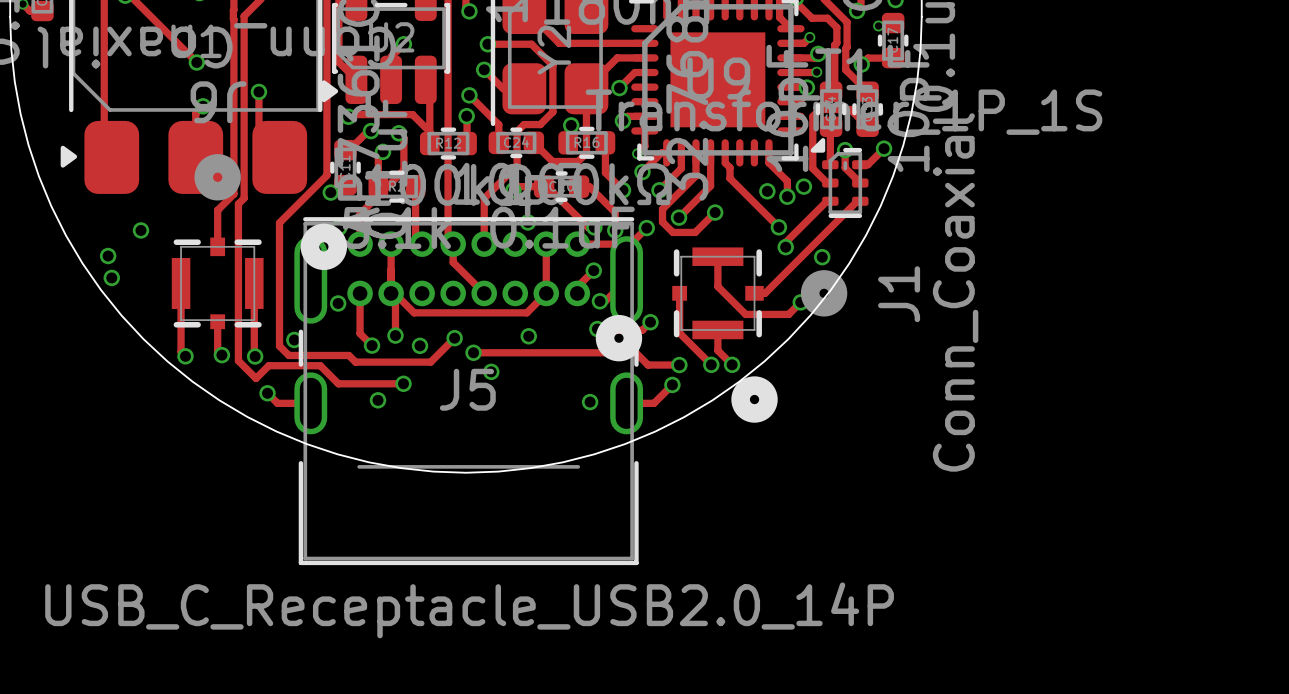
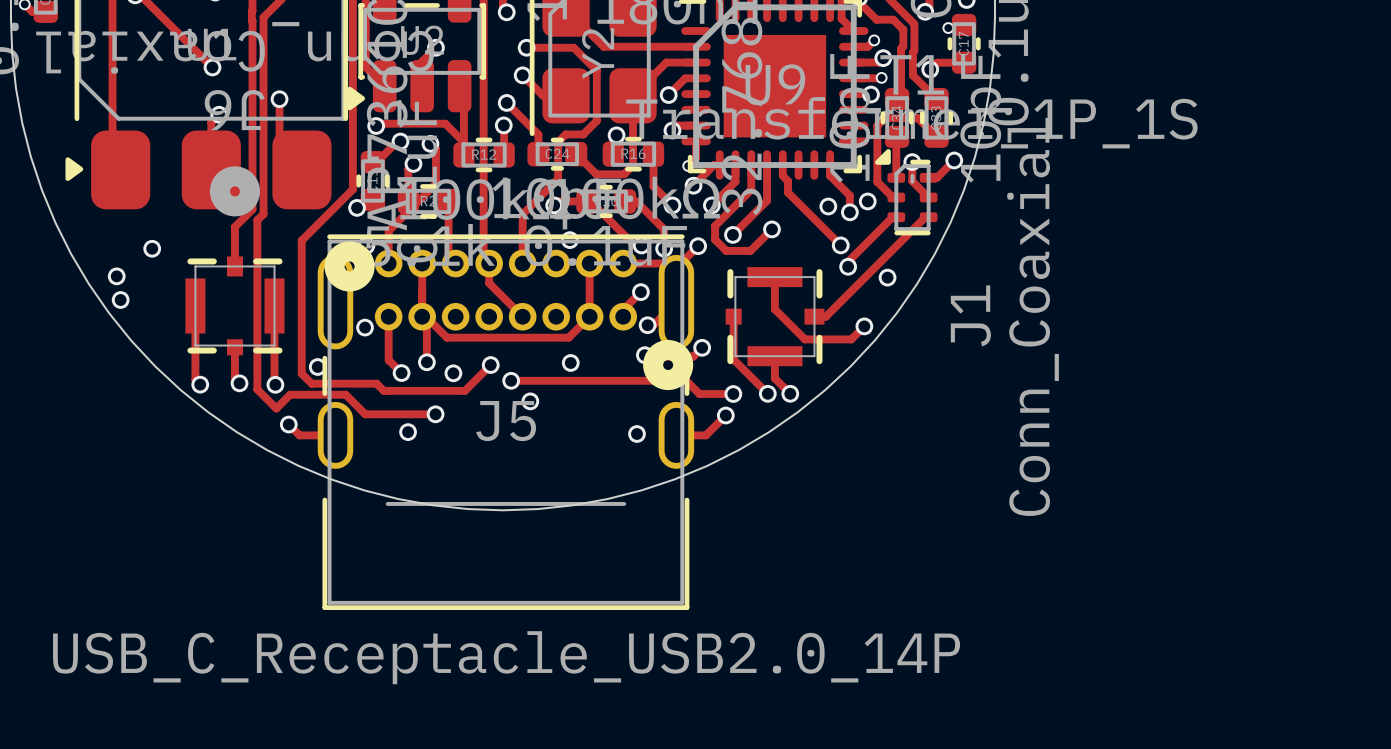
J1 footprint: [672, 247, 848, 423] -> [725, 267, 825, 367]

